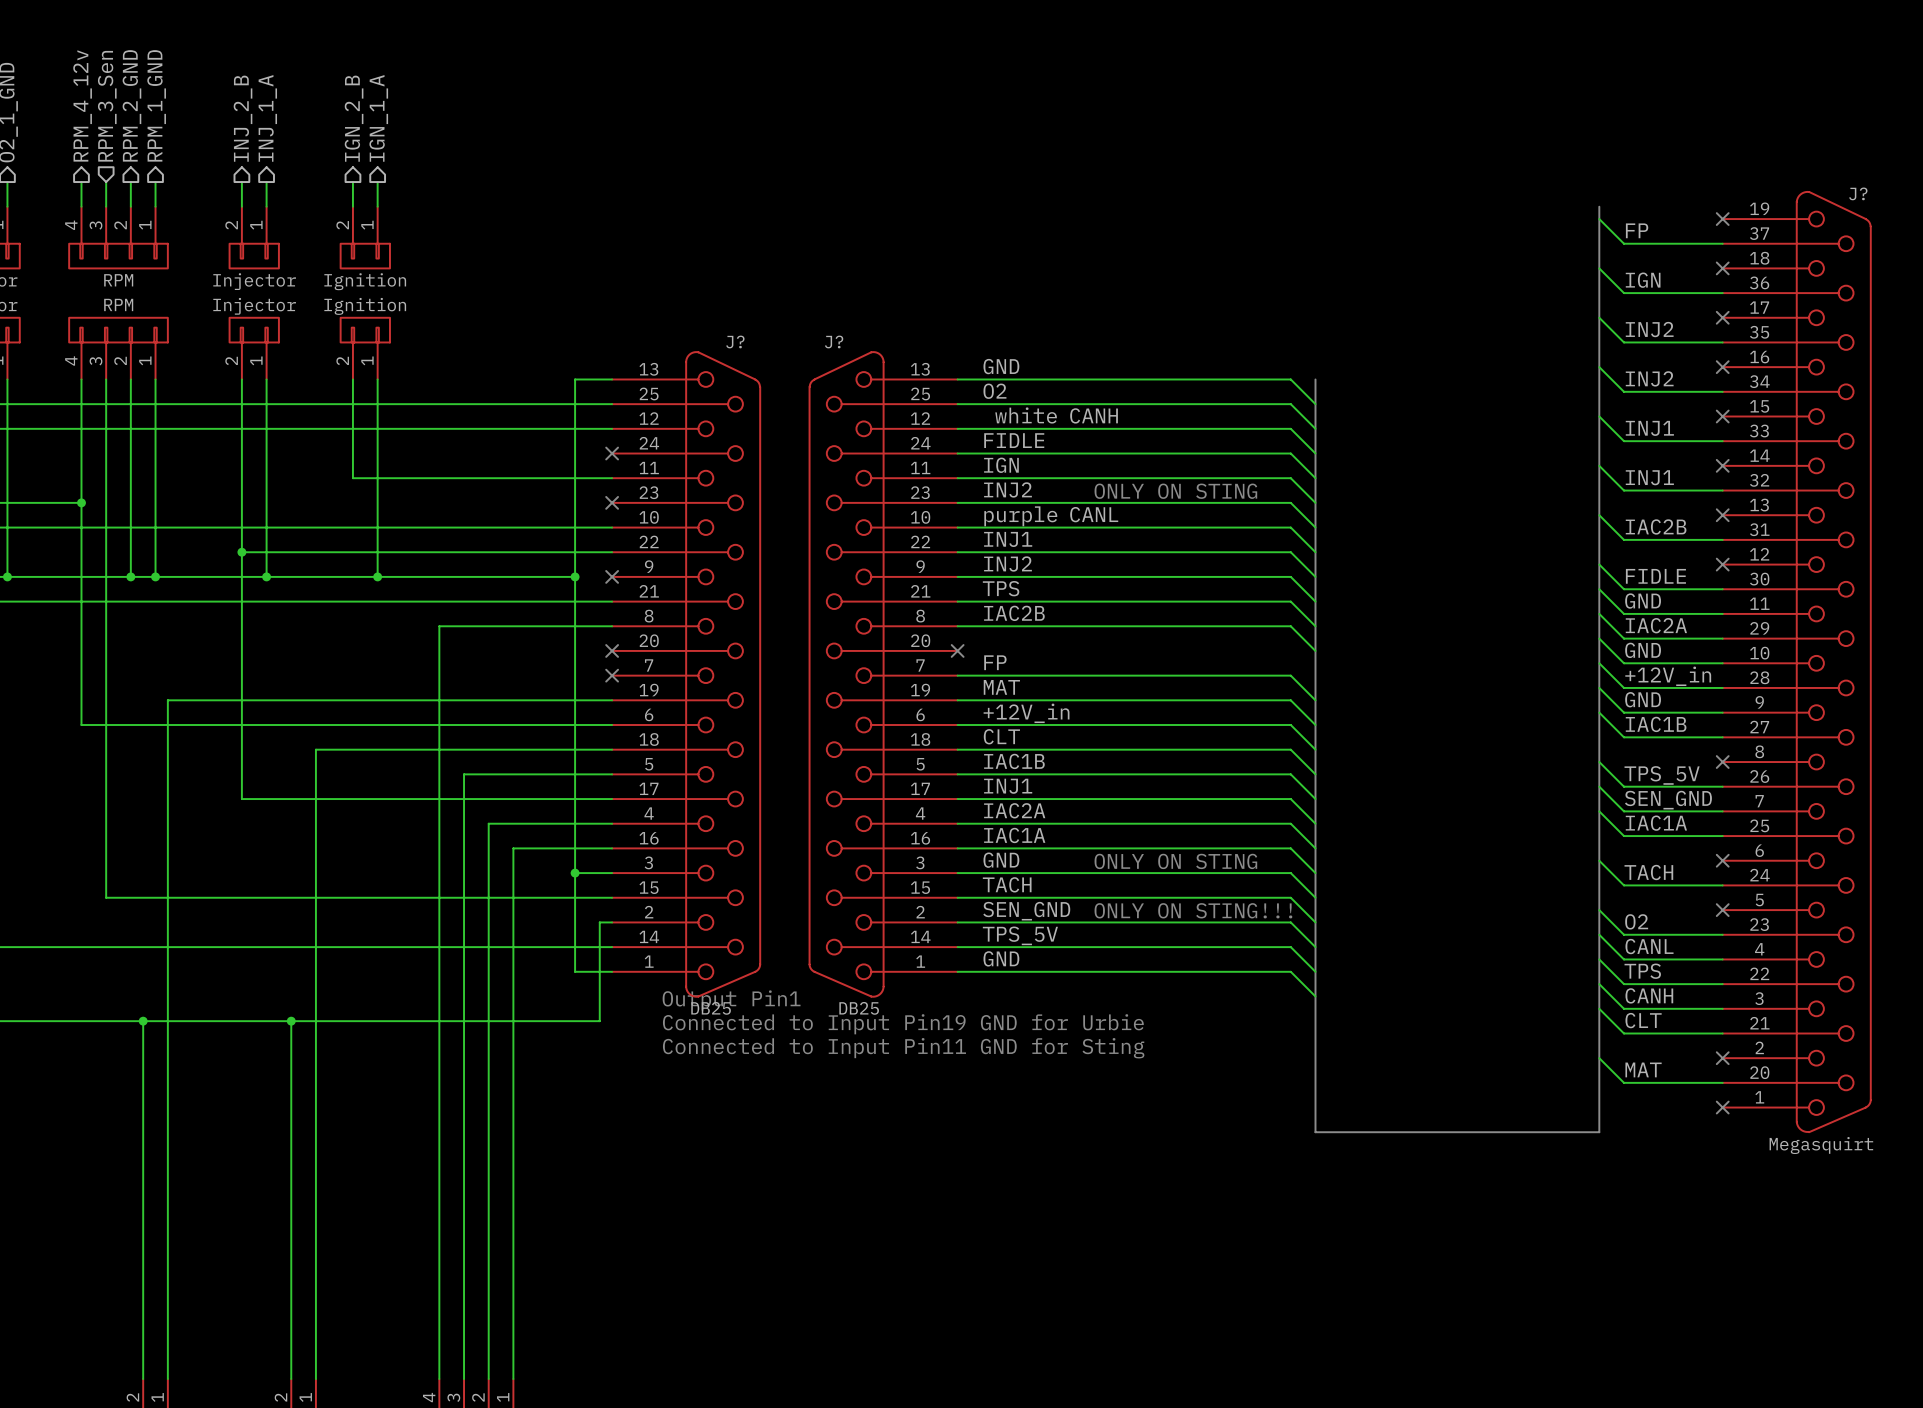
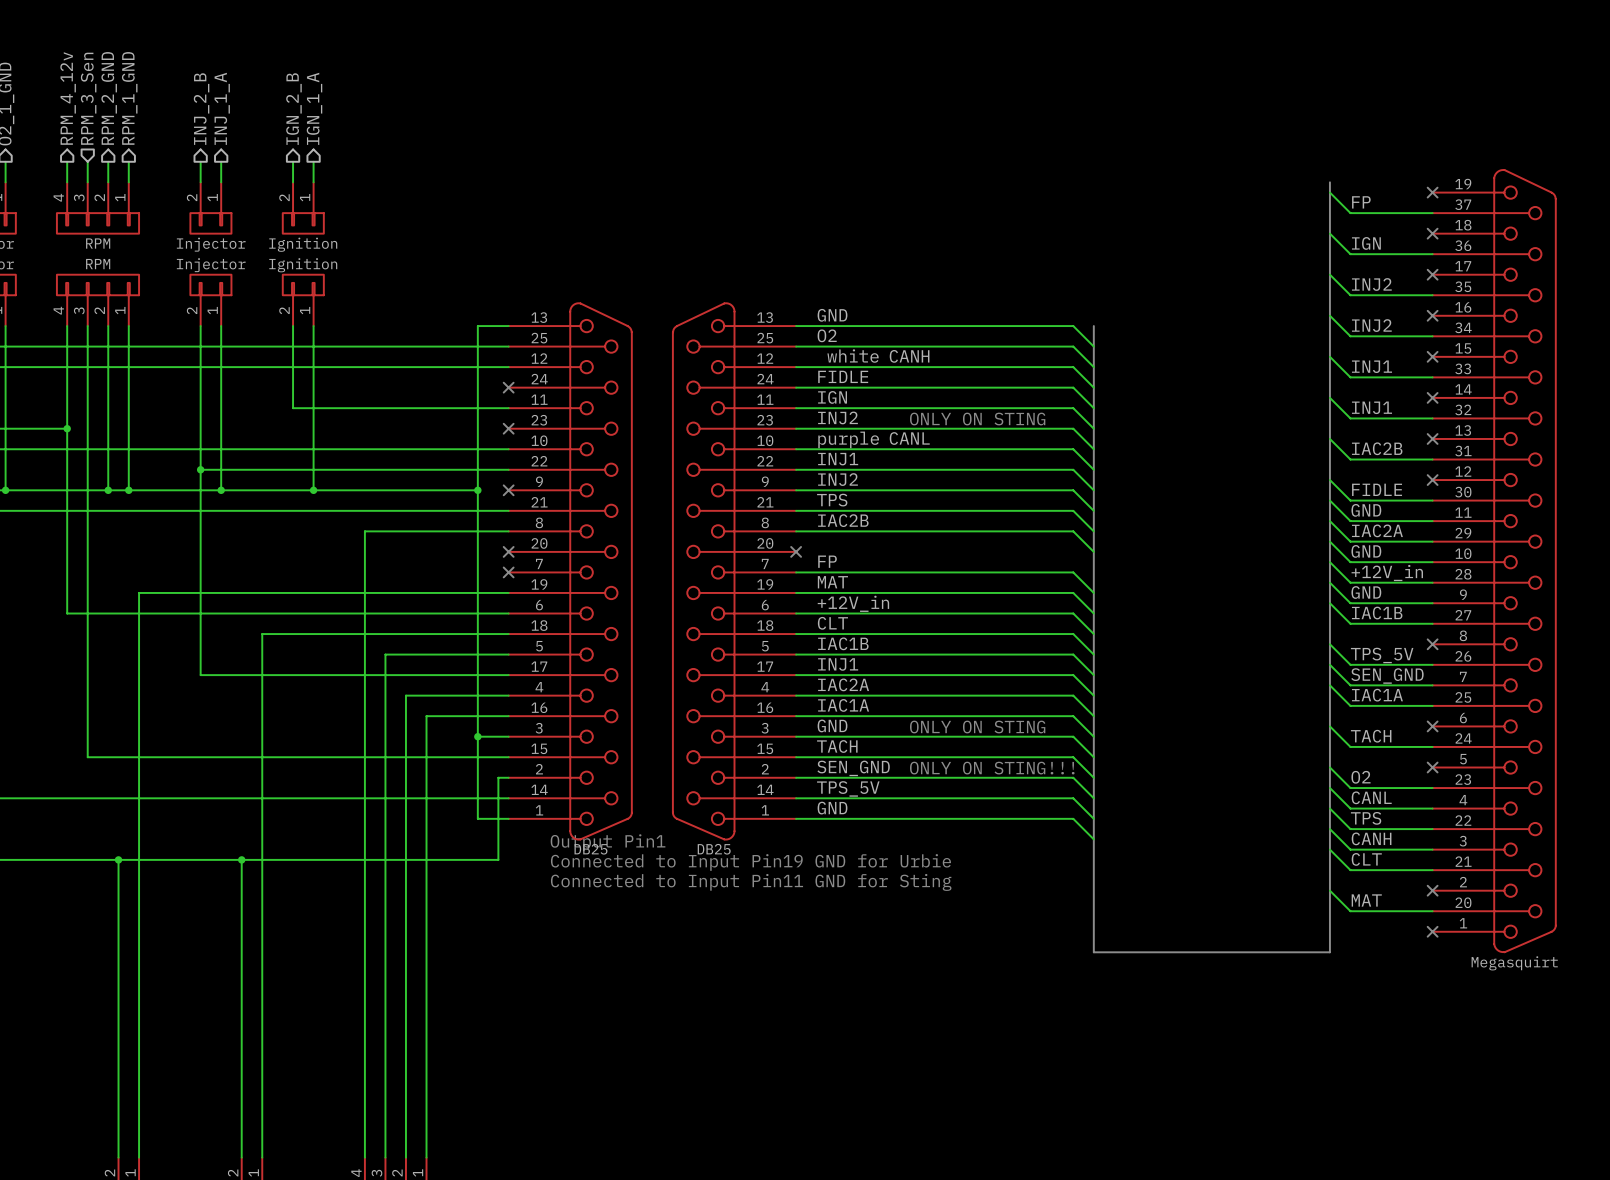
J? name: J? (1858, 193) -> none
J? name: J? (735, 341) -> none
J? name: J? (834, 341) -> none

